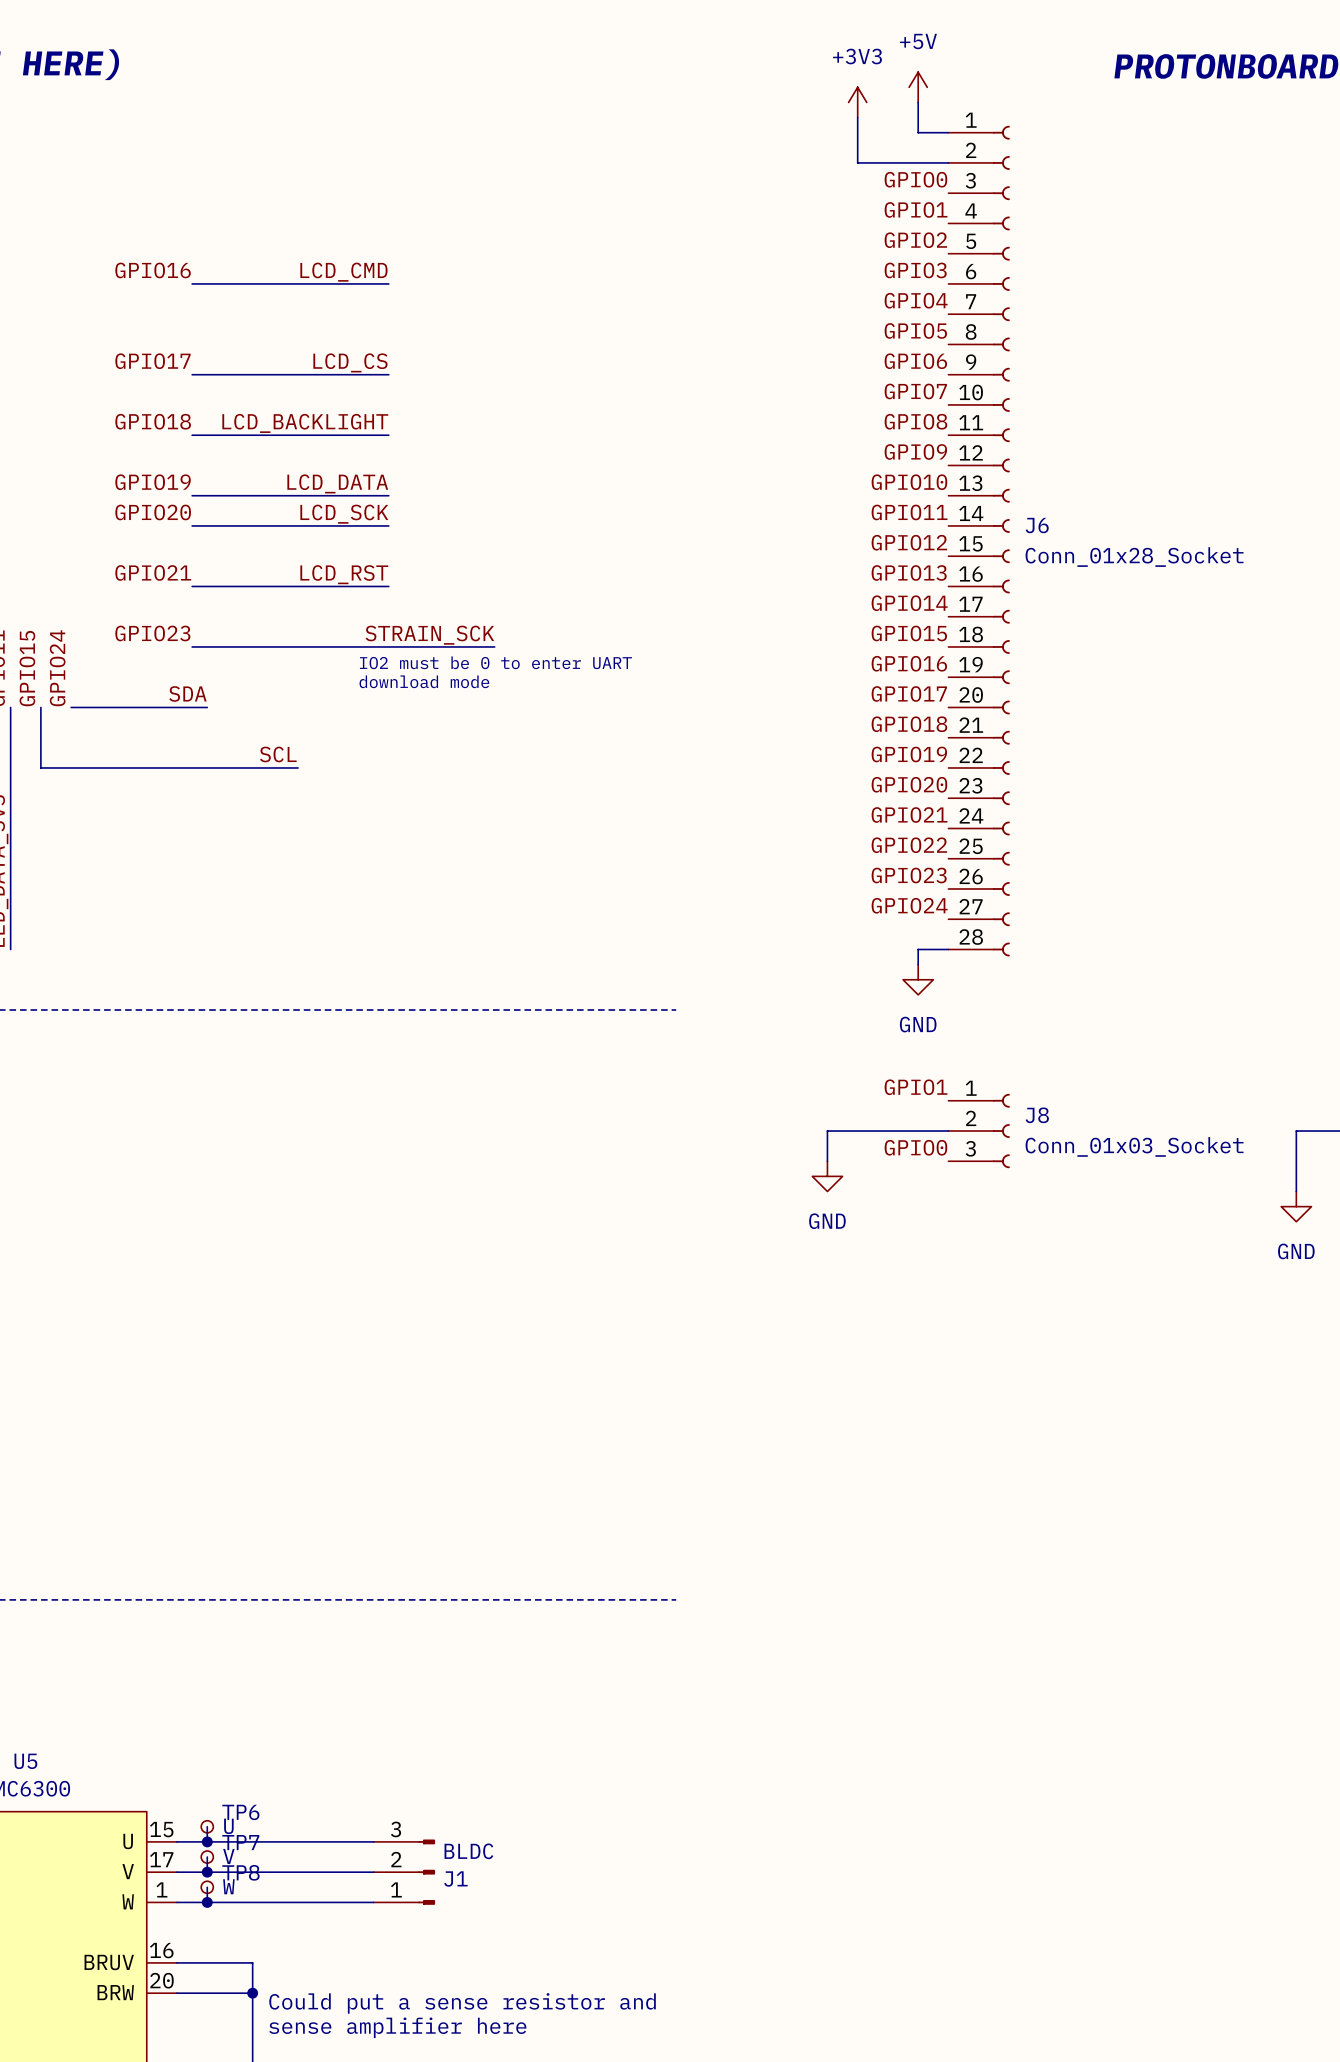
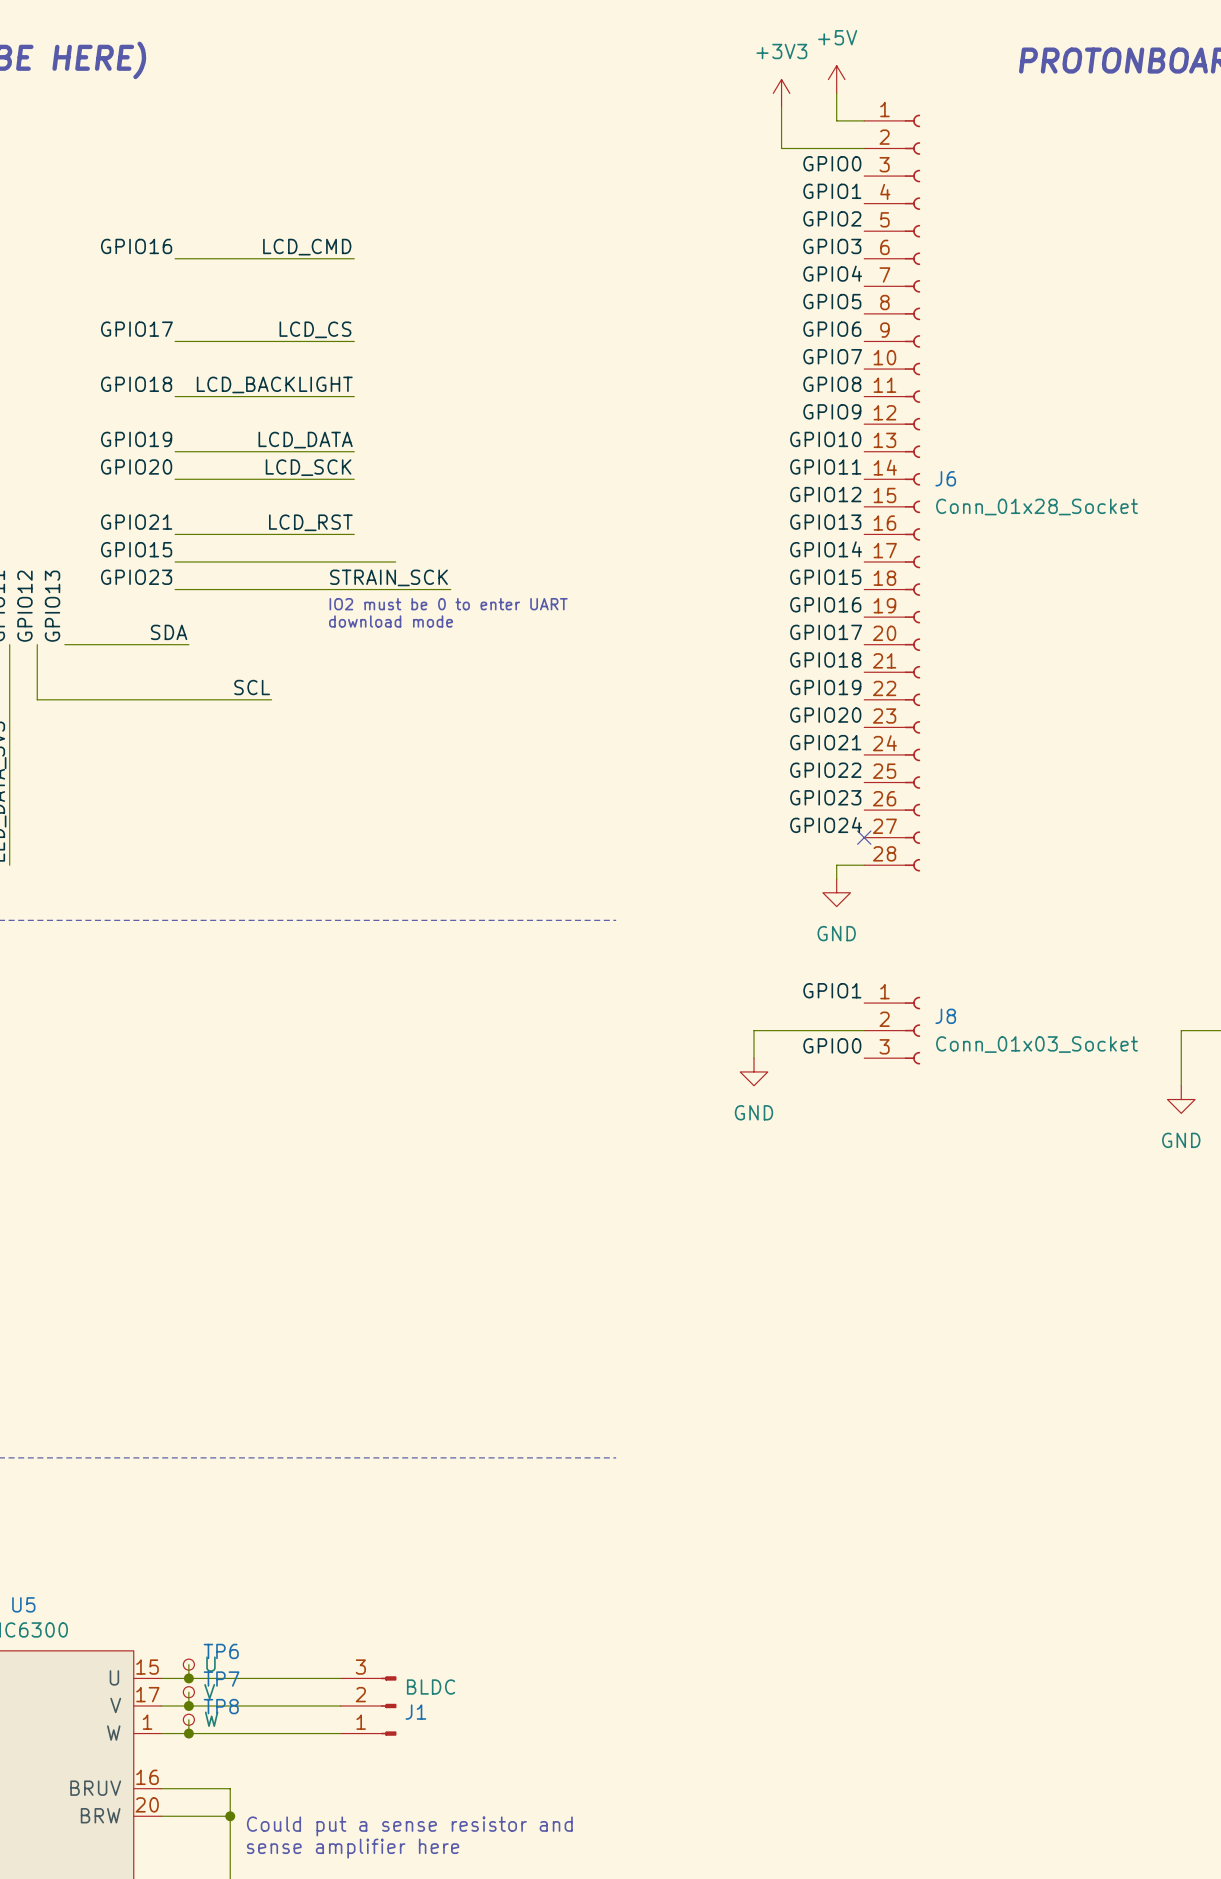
label: none -> GPIO15 (136, 549)
wire: none -> (175, 561) (395, 561)
label: GPIO15 (27, 668) -> GPIO12 (24, 606)
label: GPIO24 (57, 668) -> GPIO13 (52, 606)
no-connect mark: none -> (864, 837)

